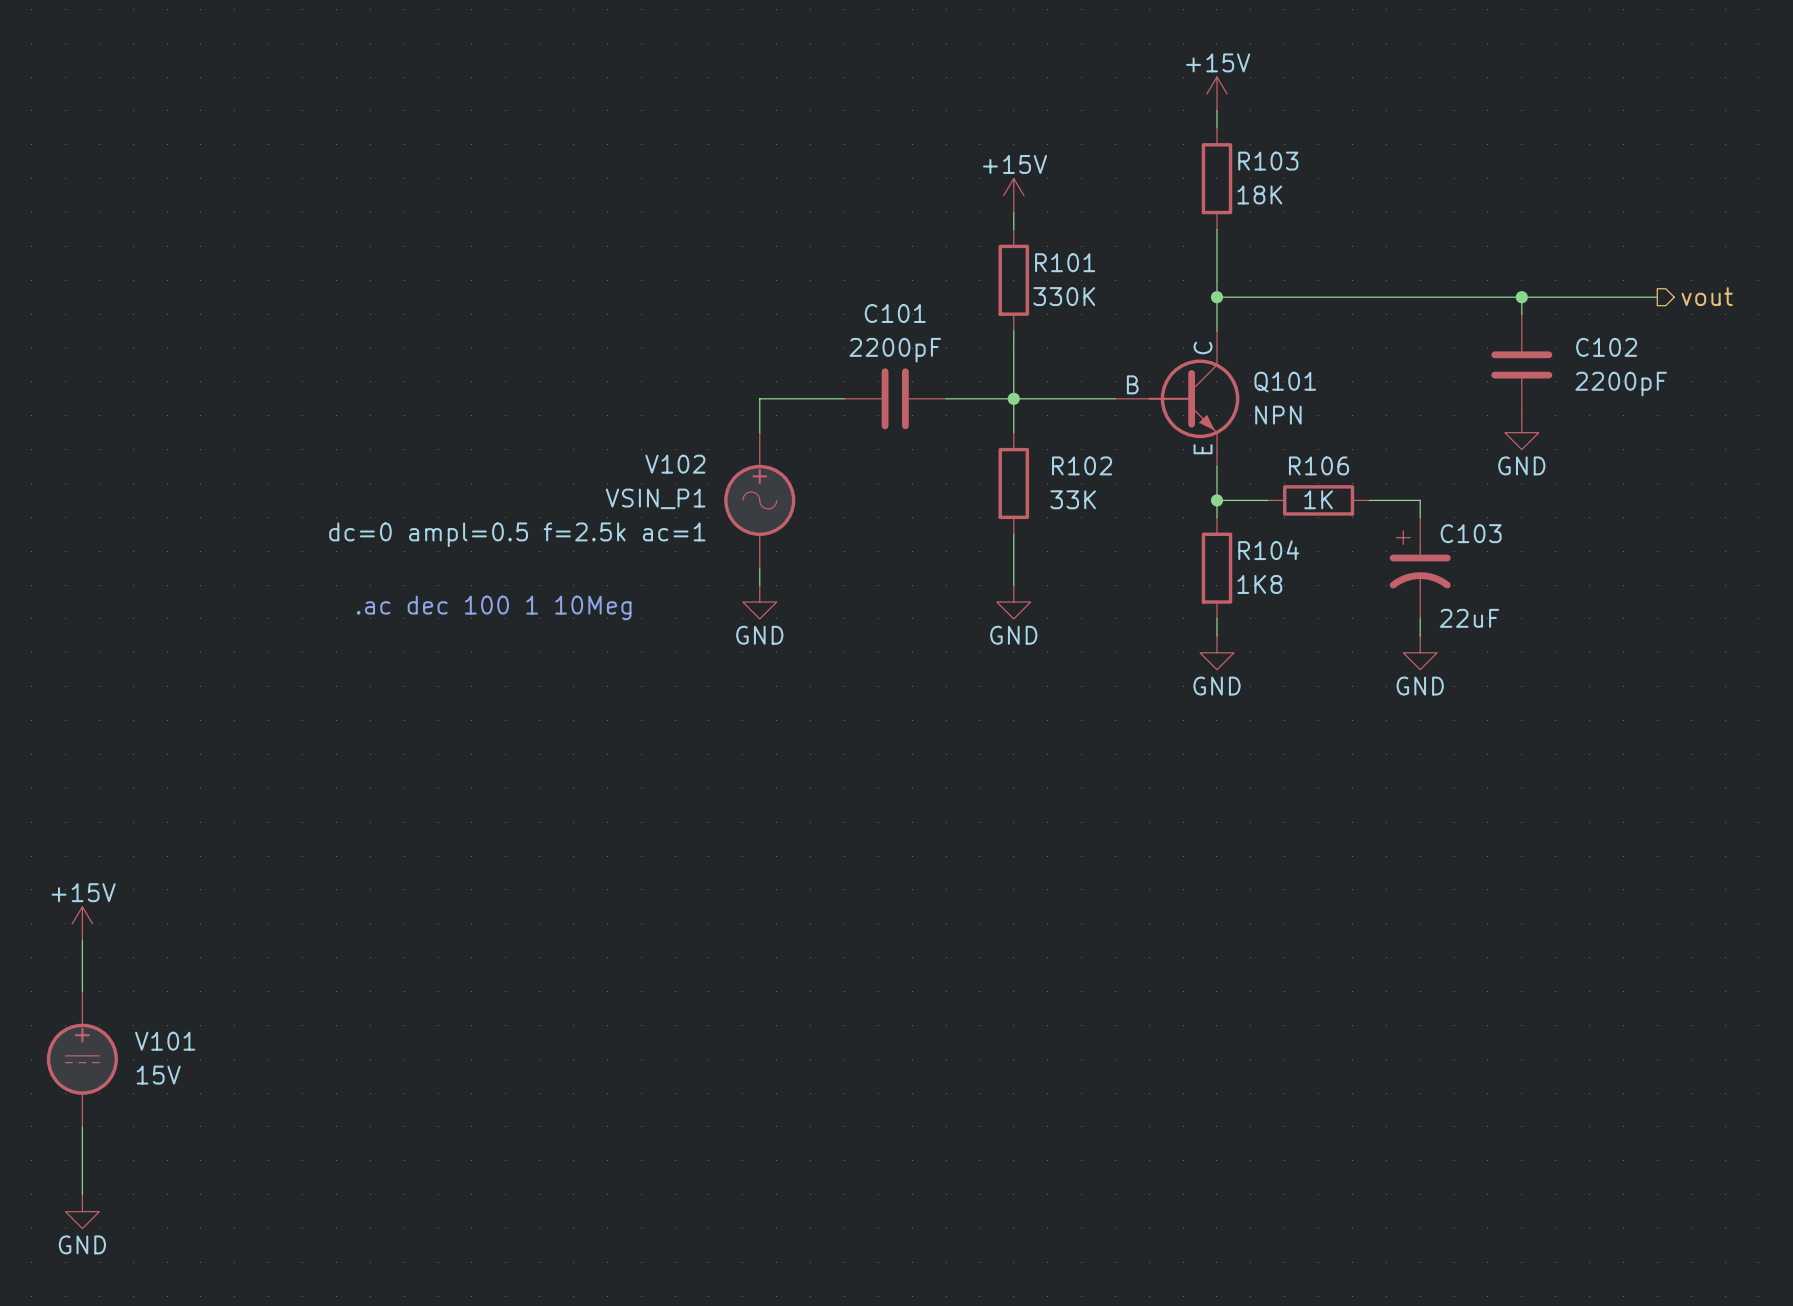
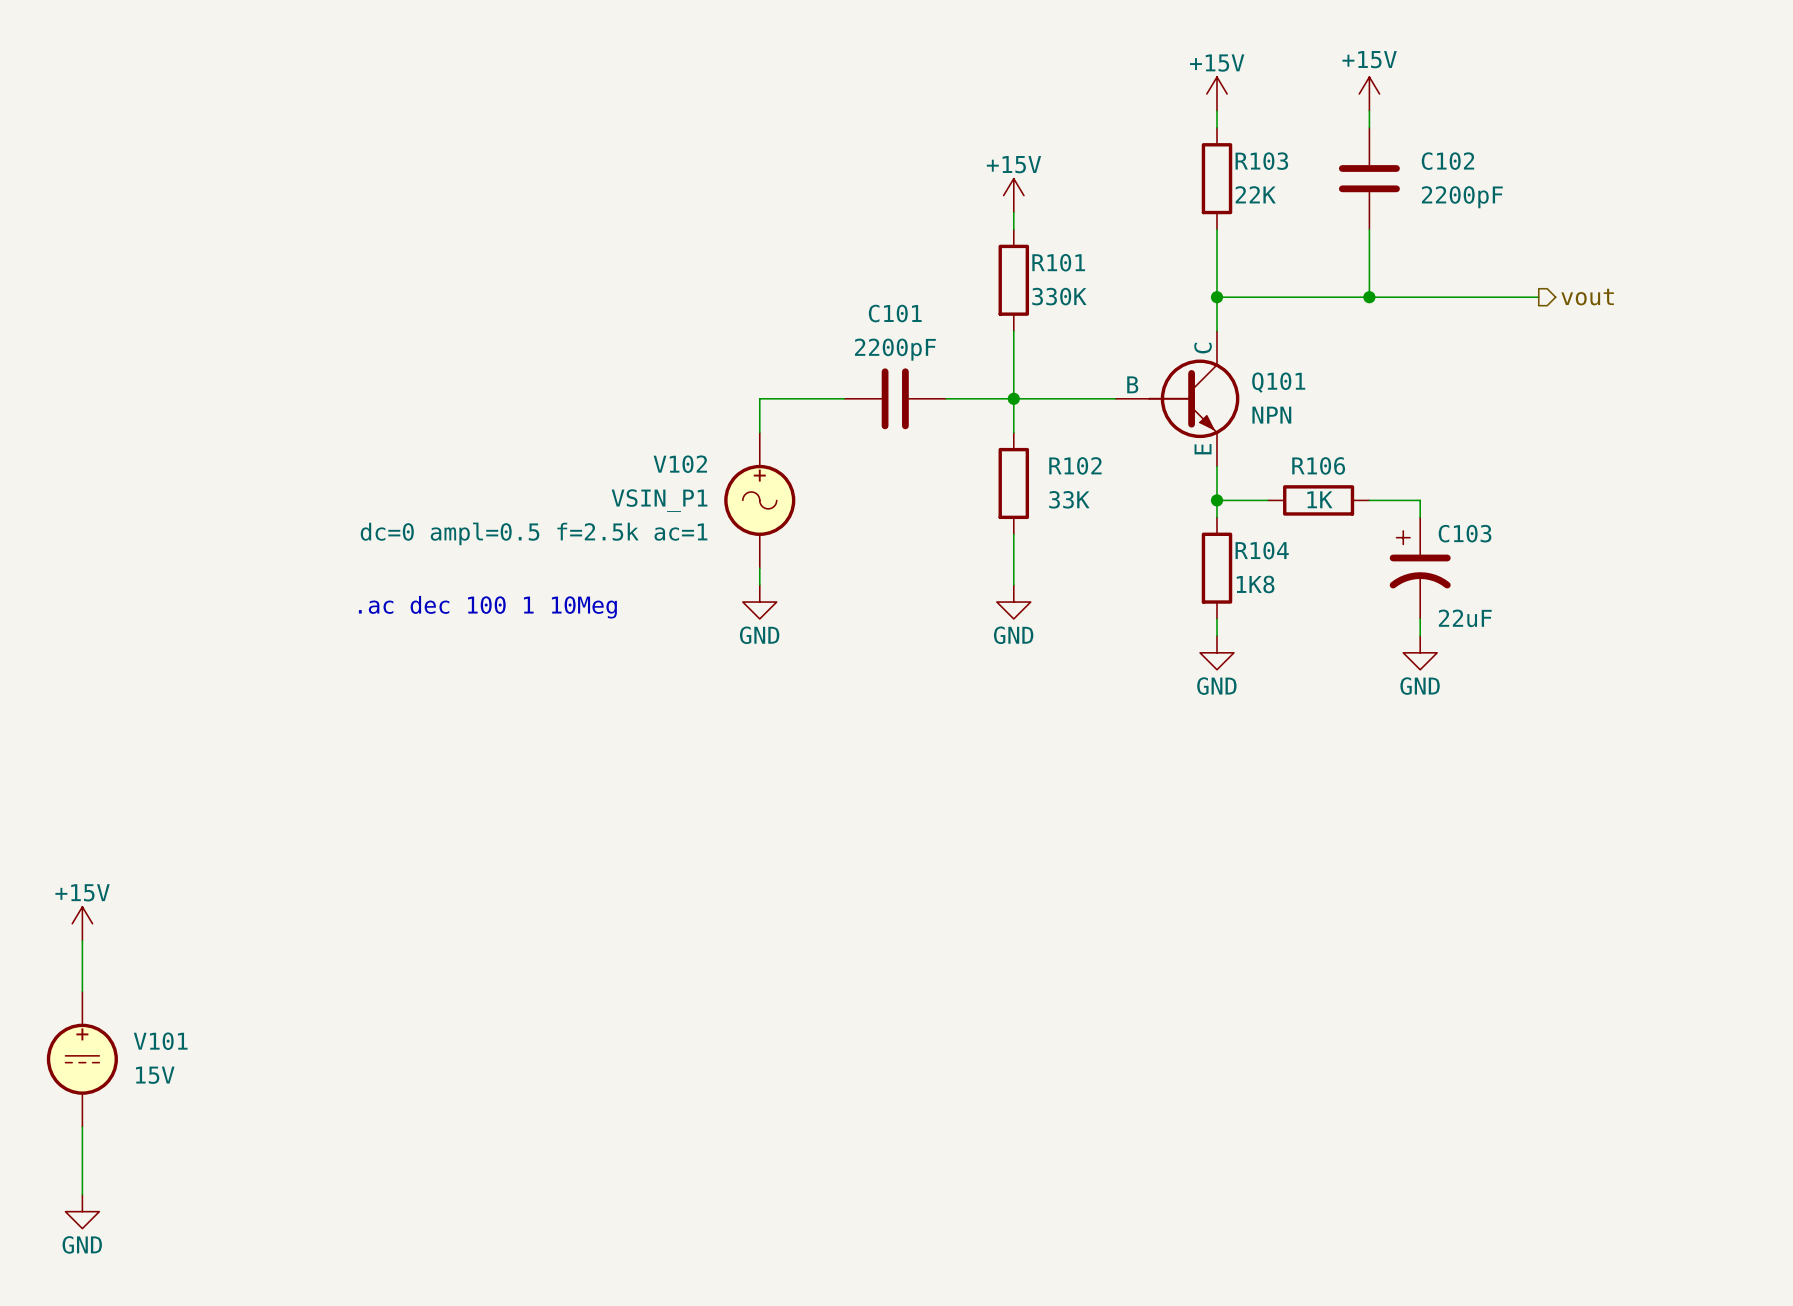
power symbol: none -> +15V (1369, 93)
R103 value: 18K (1259, 194) -> 22K (1255, 194)
wire: none -> (1369, 229) (1369, 297)
hierarchical label position: vout (1707, 296) -> vout (1587, 297)
junction: none -> (1369, 297)
wire: (1521, 297) (1521, 314) -> (1369, 110) (1369, 127)
junction: (1521, 297) -> none
wire: (1538, 297) (1657, 297) -> none
C102 position: (1521, 364) -> (1369, 178)
power symbol: GND (1521, 432) -> none

